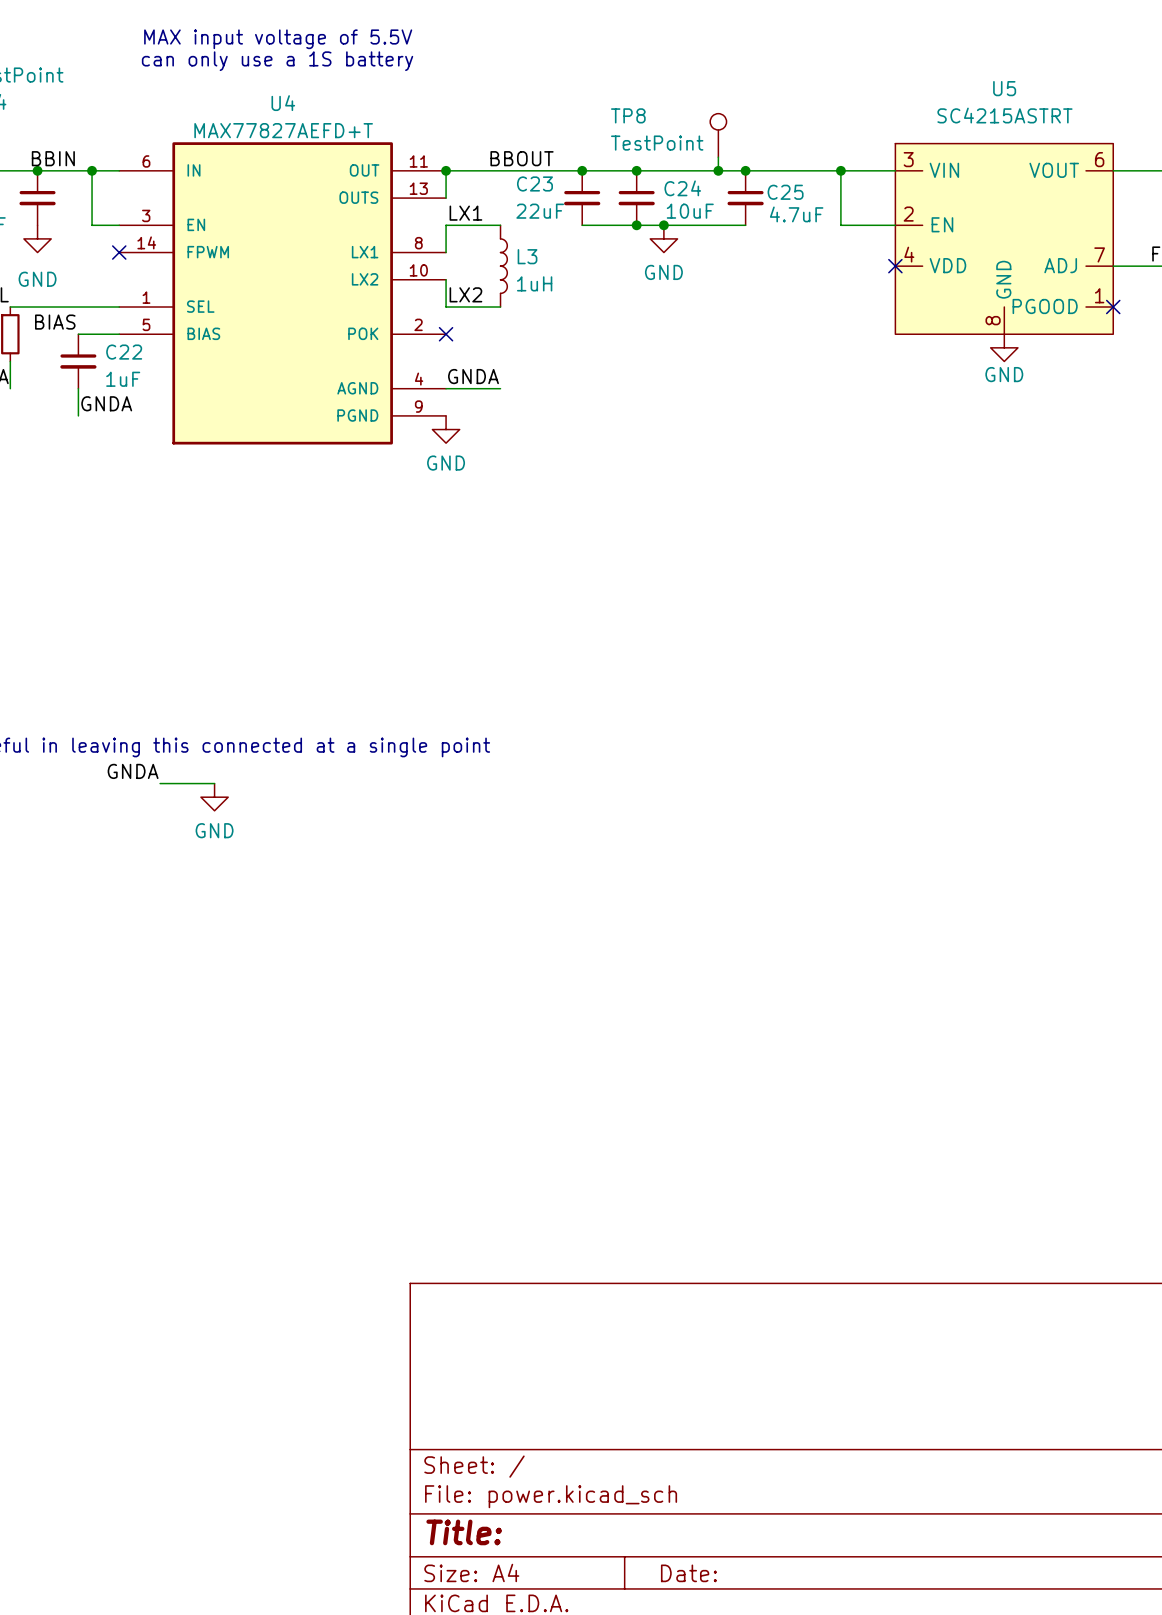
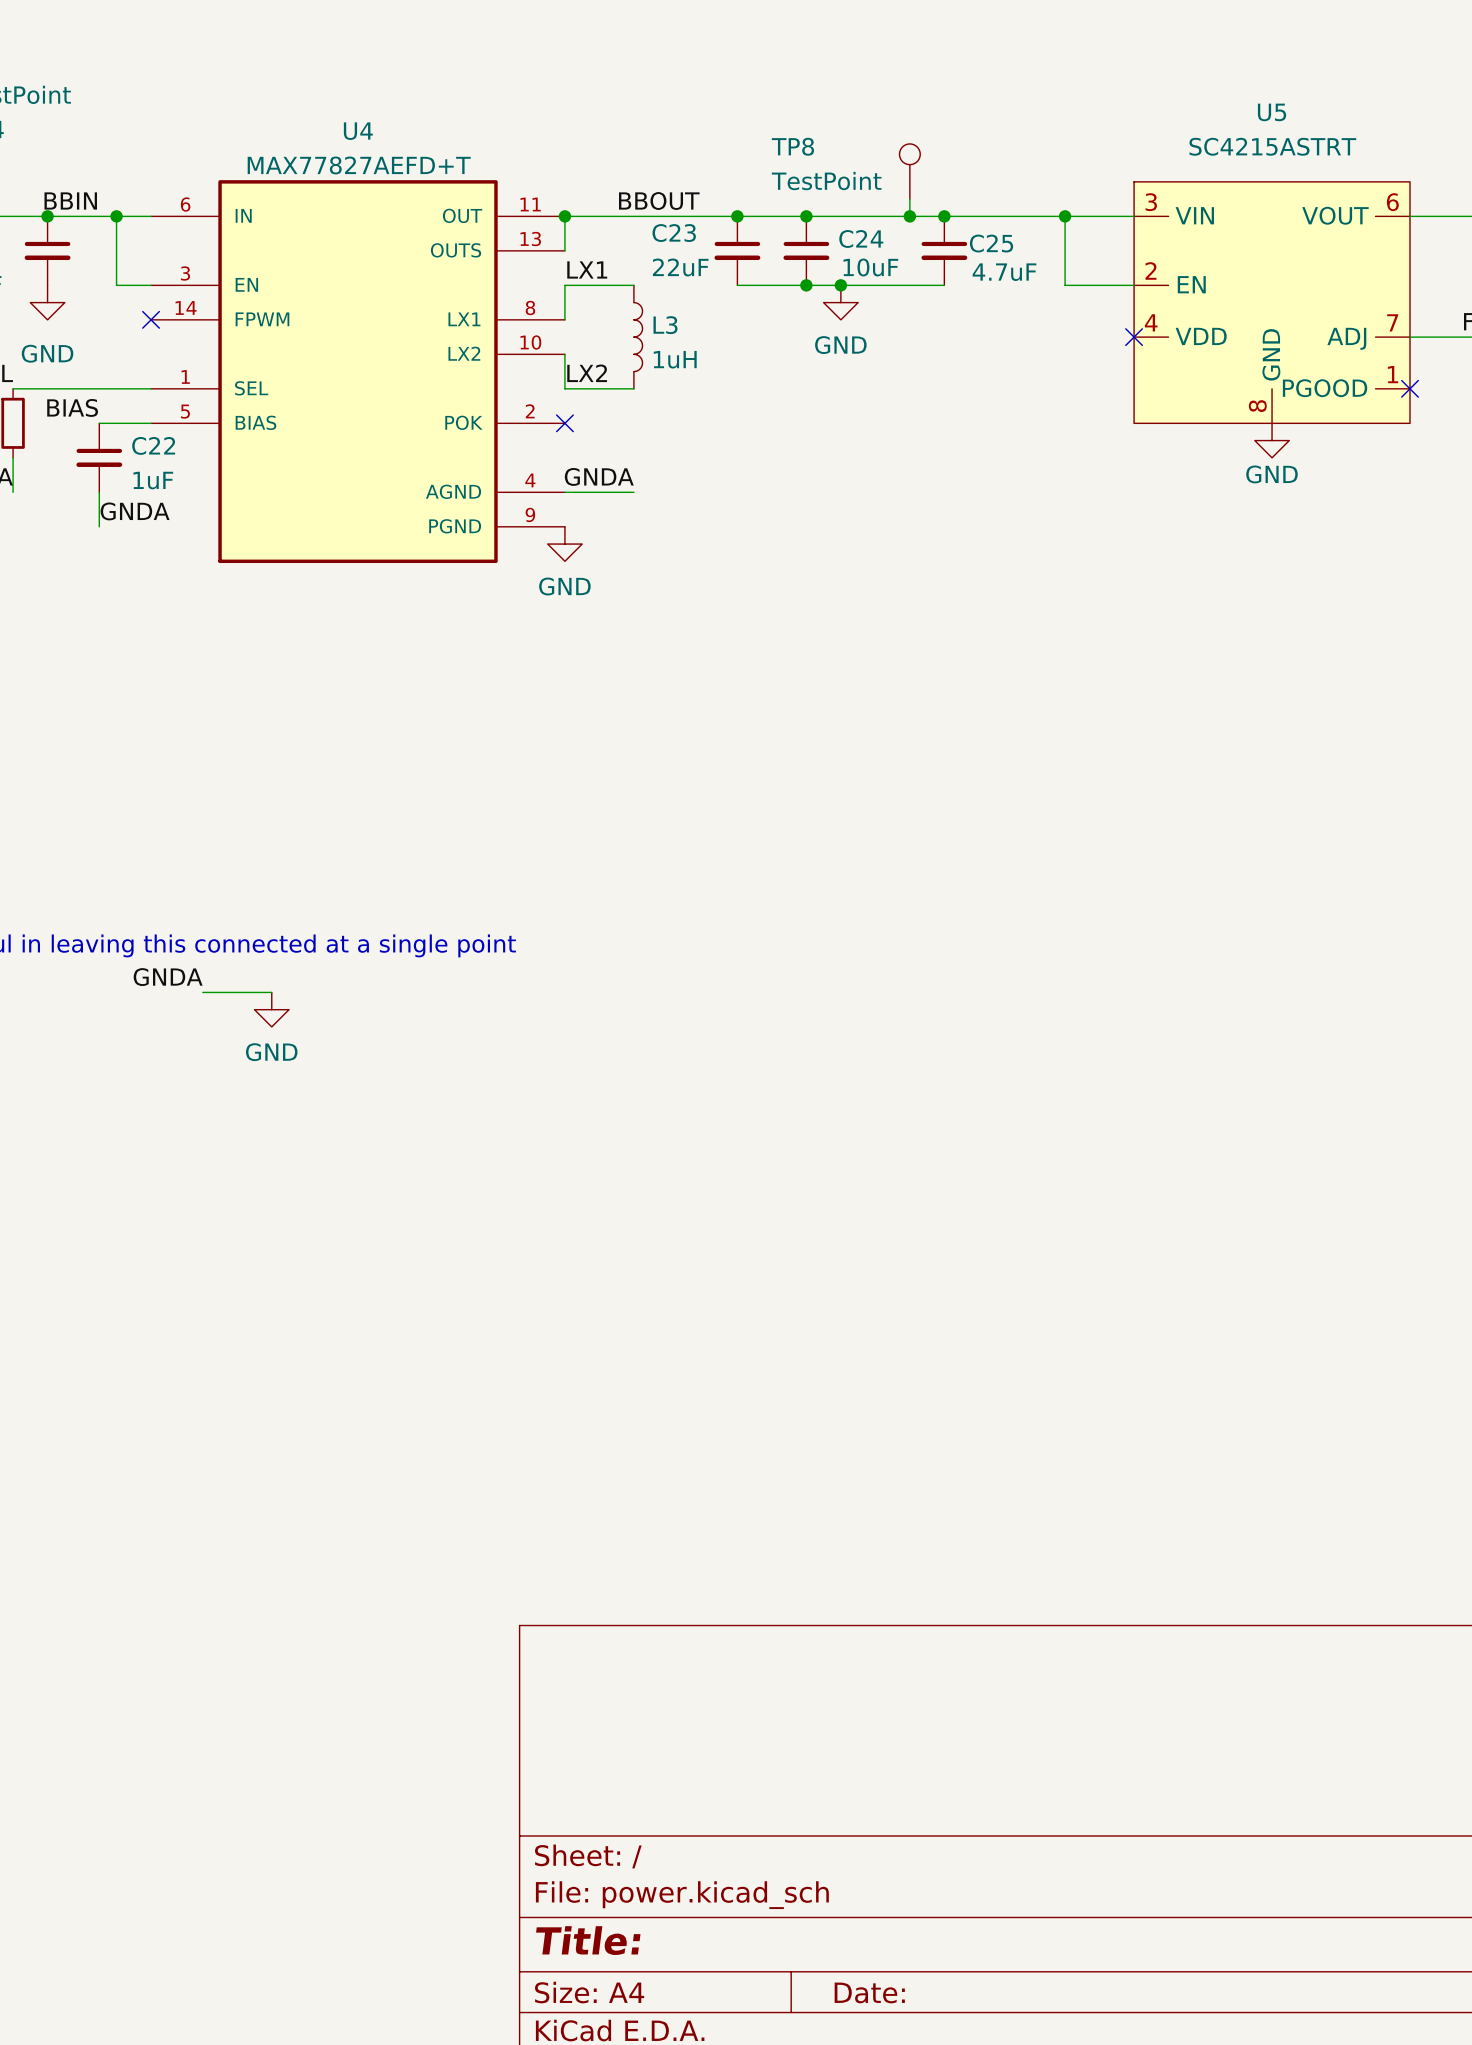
text: MAX input voltage of 5.5V (278, 39) -> none
text: can only use a 1S battery (277, 61) -> none

